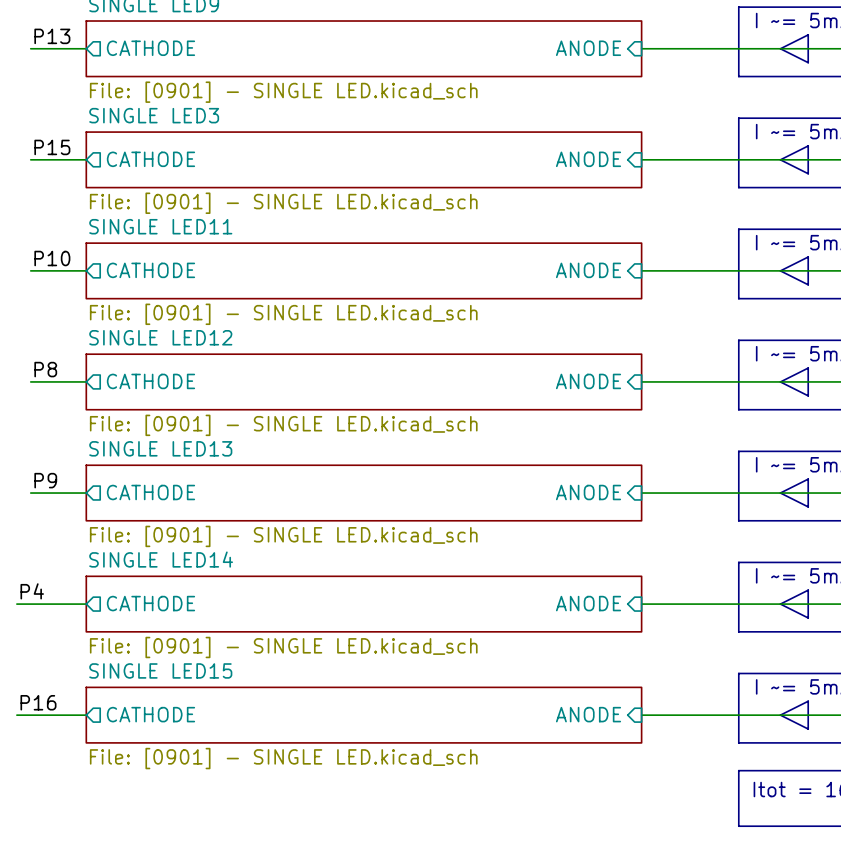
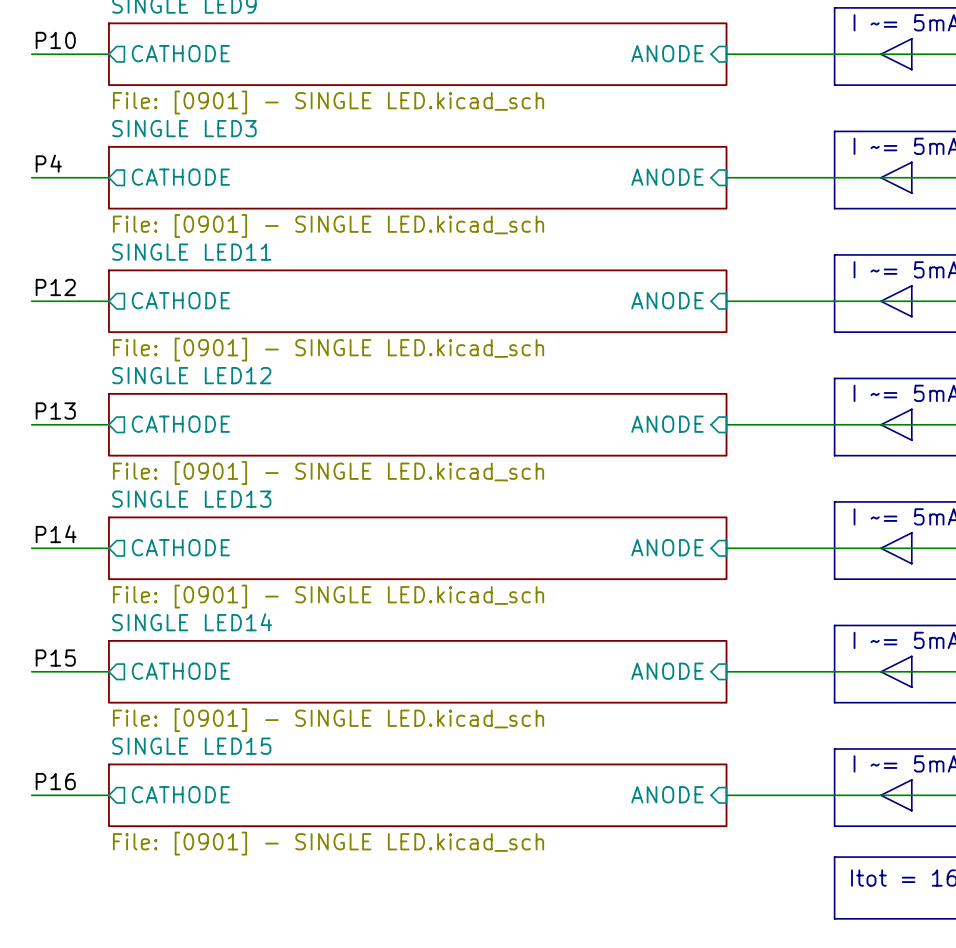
label: P13 (52, 36) -> none
wire: none -> (31, 54) (47, 54)
label: none -> P4 (48, 163)
label: P15 (52, 147) -> none
wire: none -> (31, 177) (47, 177)
label: none -> P12 (55, 287)
label position: P10 (52, 258) -> P10 (55, 40)
wire: none -> (31, 301) (47, 301)
label: none -> P13 (55, 410)
label: P8 (45, 369) -> none
wire: none -> (31, 424) (47, 424)
label: none -> P14 (56, 534)
label: P9 (45, 480) -> none
wire: none -> (31, 548) (47, 548)
label: P4 (32, 591) -> P15 (55, 658)

